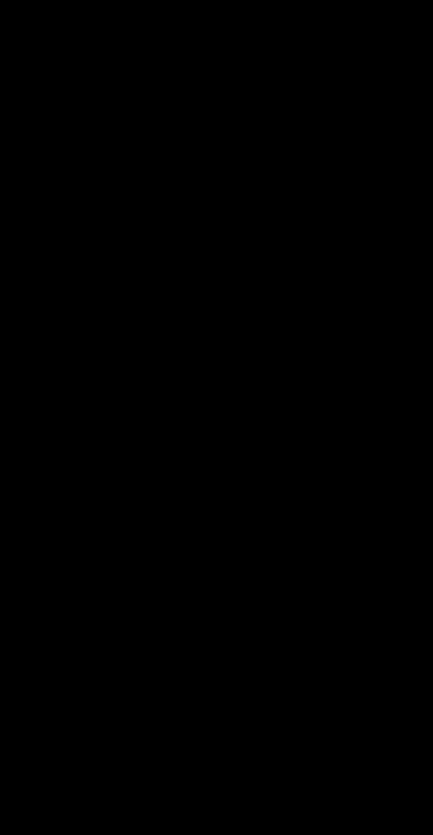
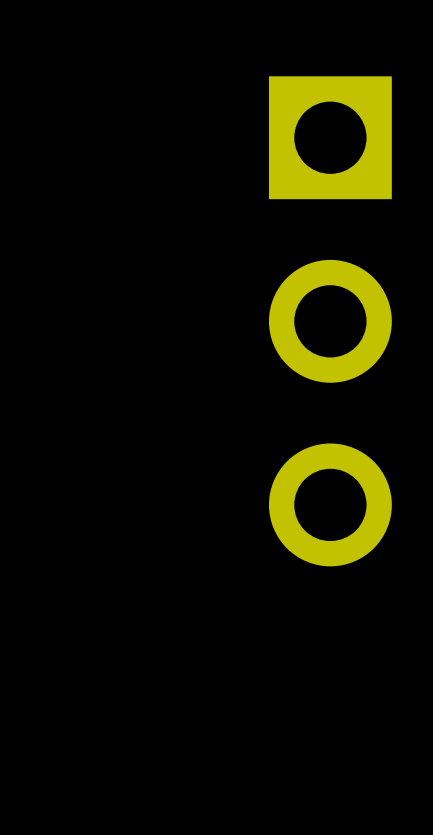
part: none -> (330, 321)

